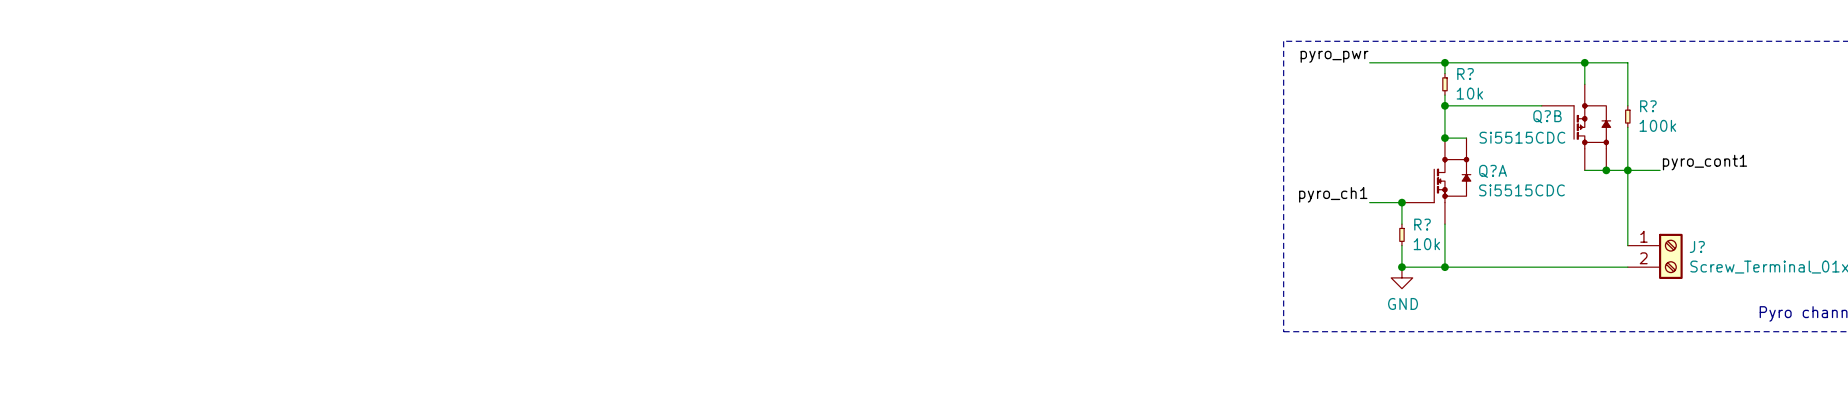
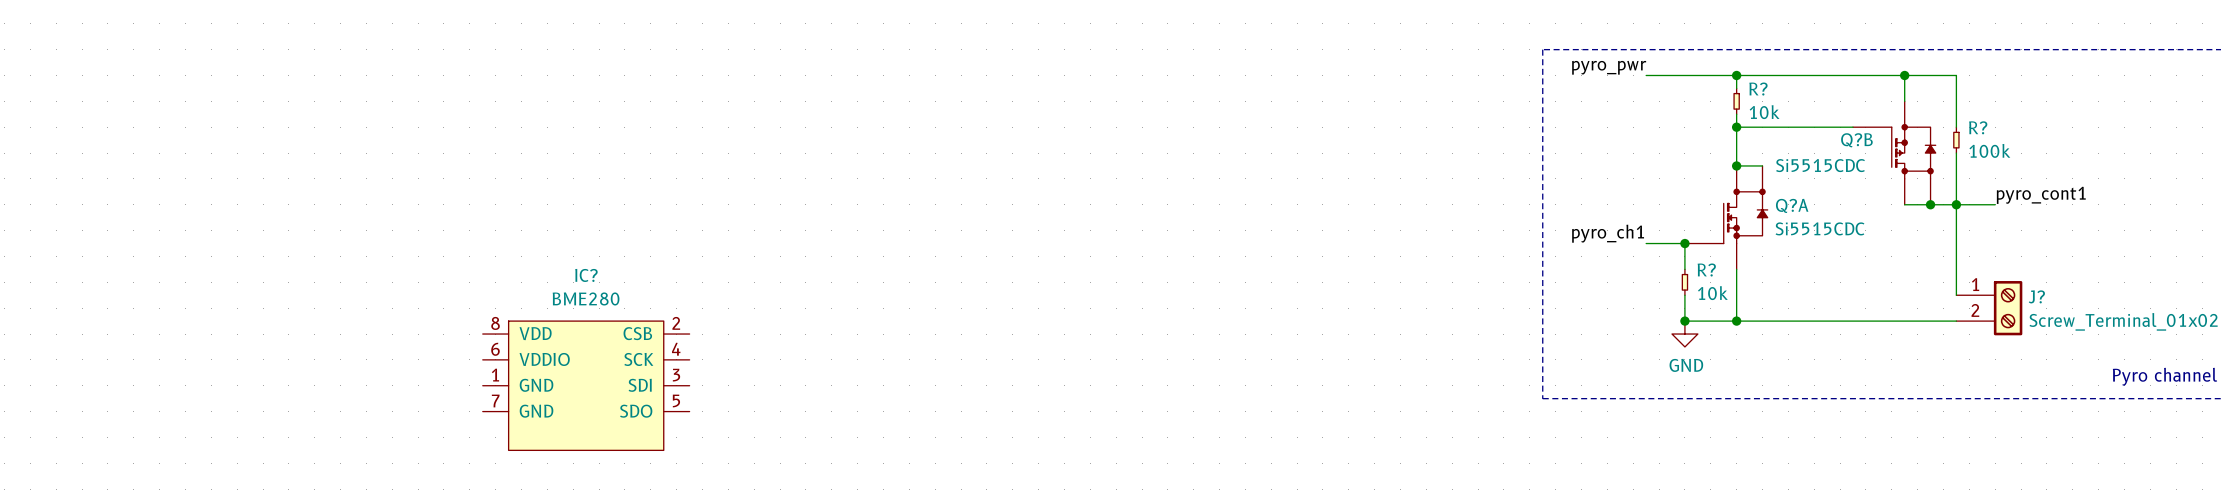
IC?: none -> BME280 (586, 385)

